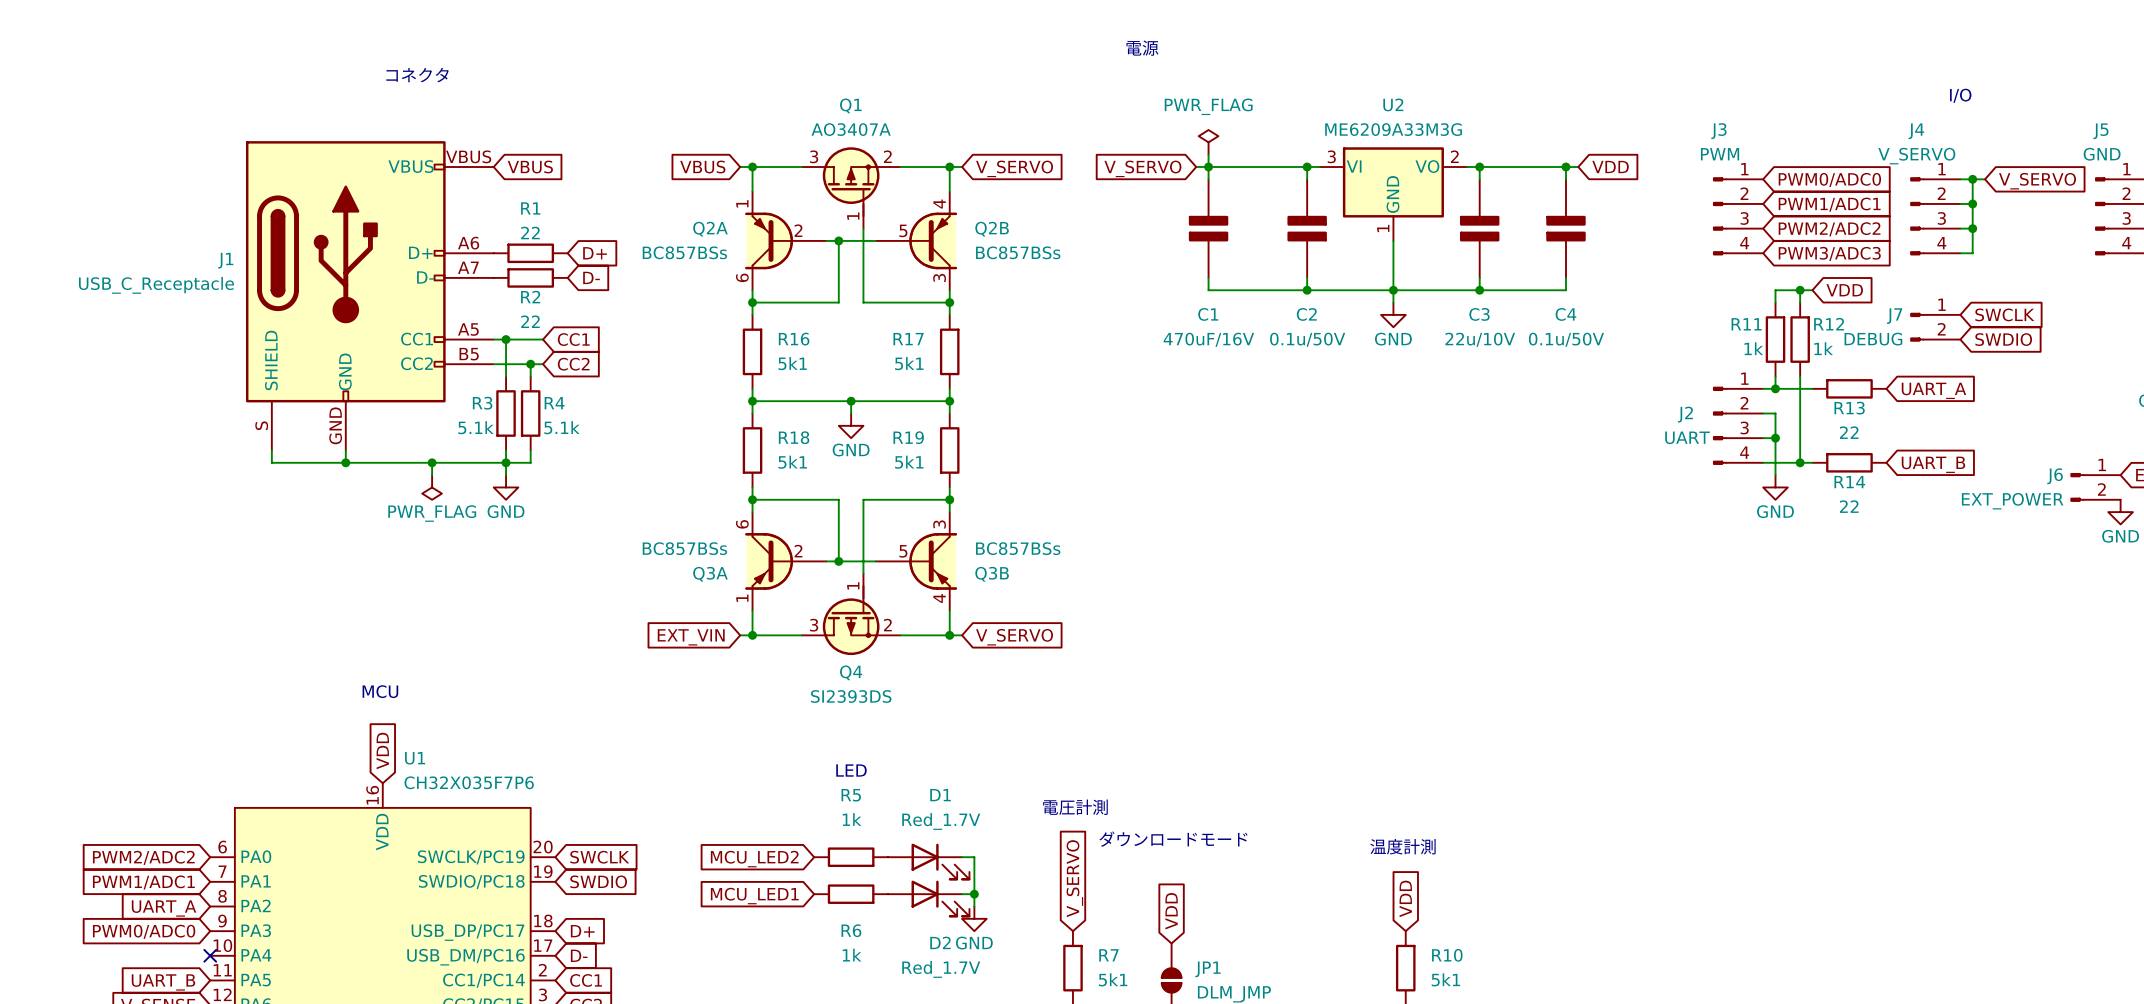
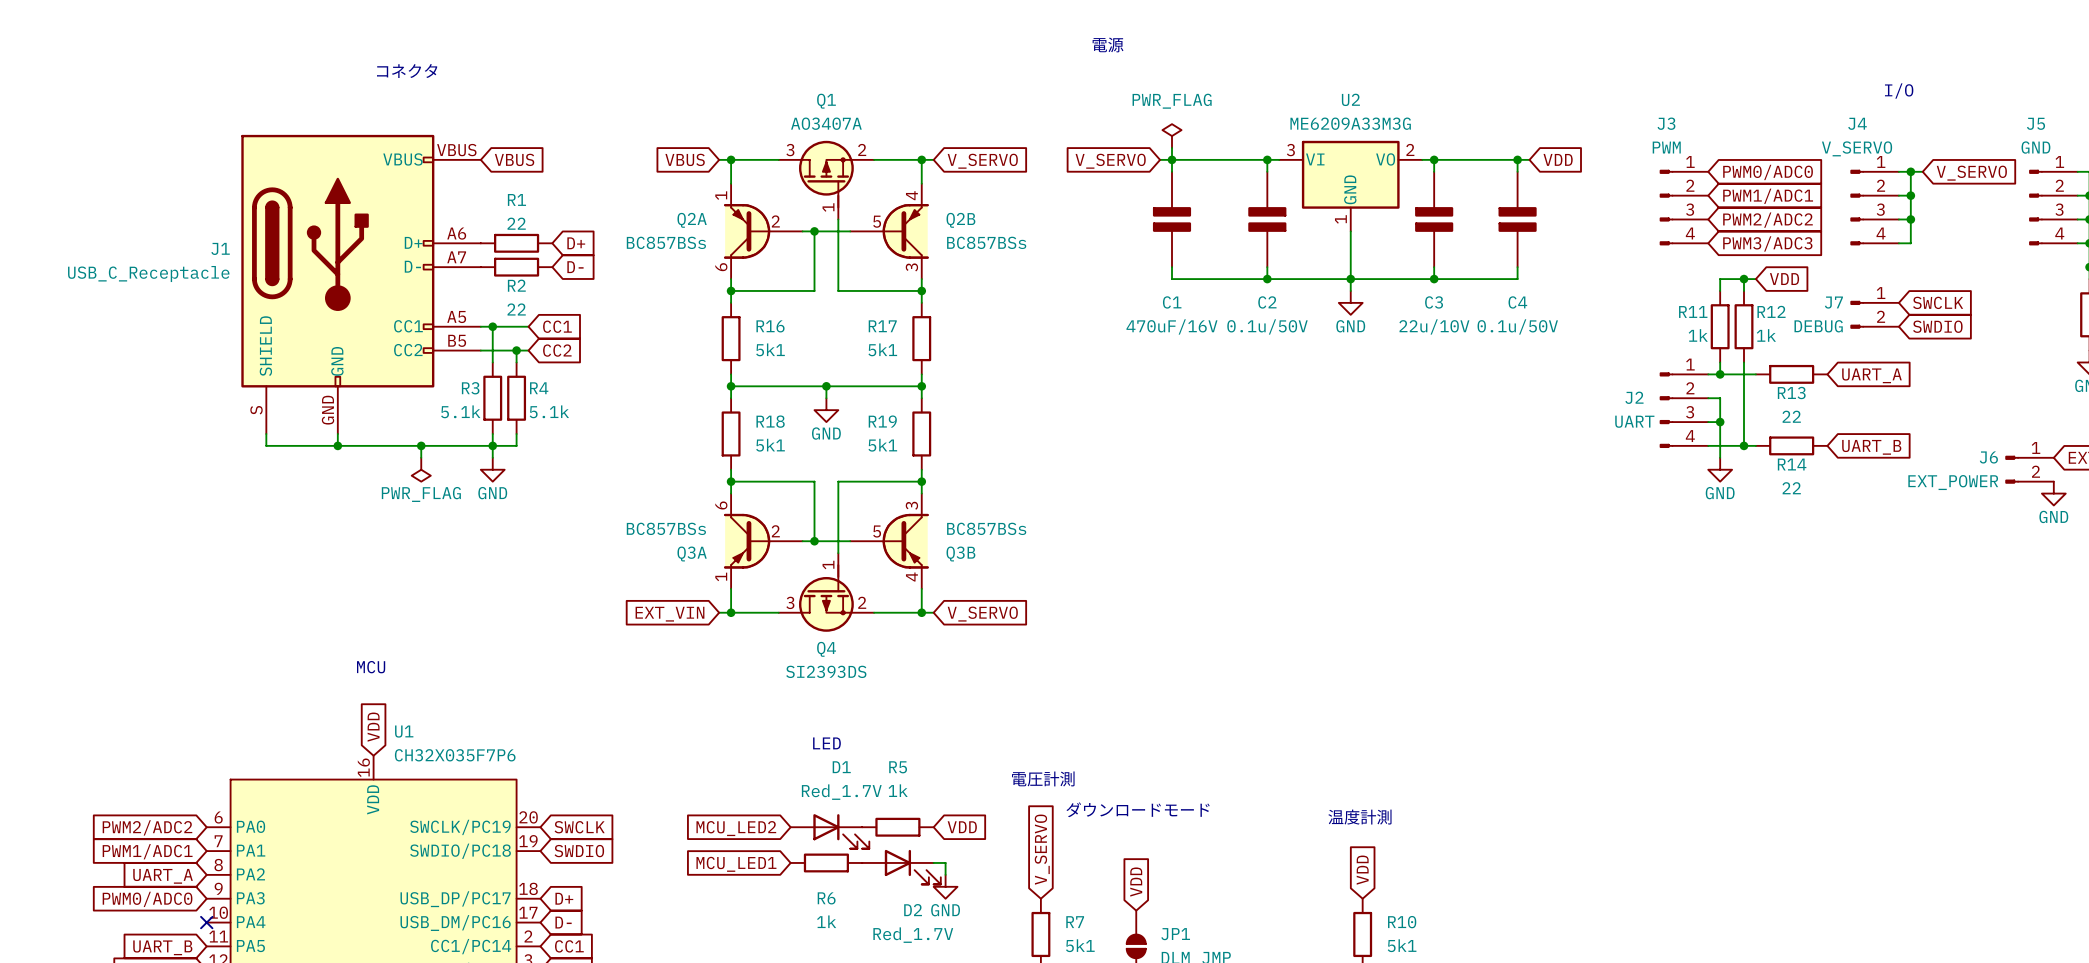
R5 position: (851, 857) -> (897, 827)
wire: (962, 857) (974, 857) (974, 894) -> none
global label: none -> VDD (962, 827)
D1 position: (928, 861) -> (829, 831)
junction: (974, 894) -> none

